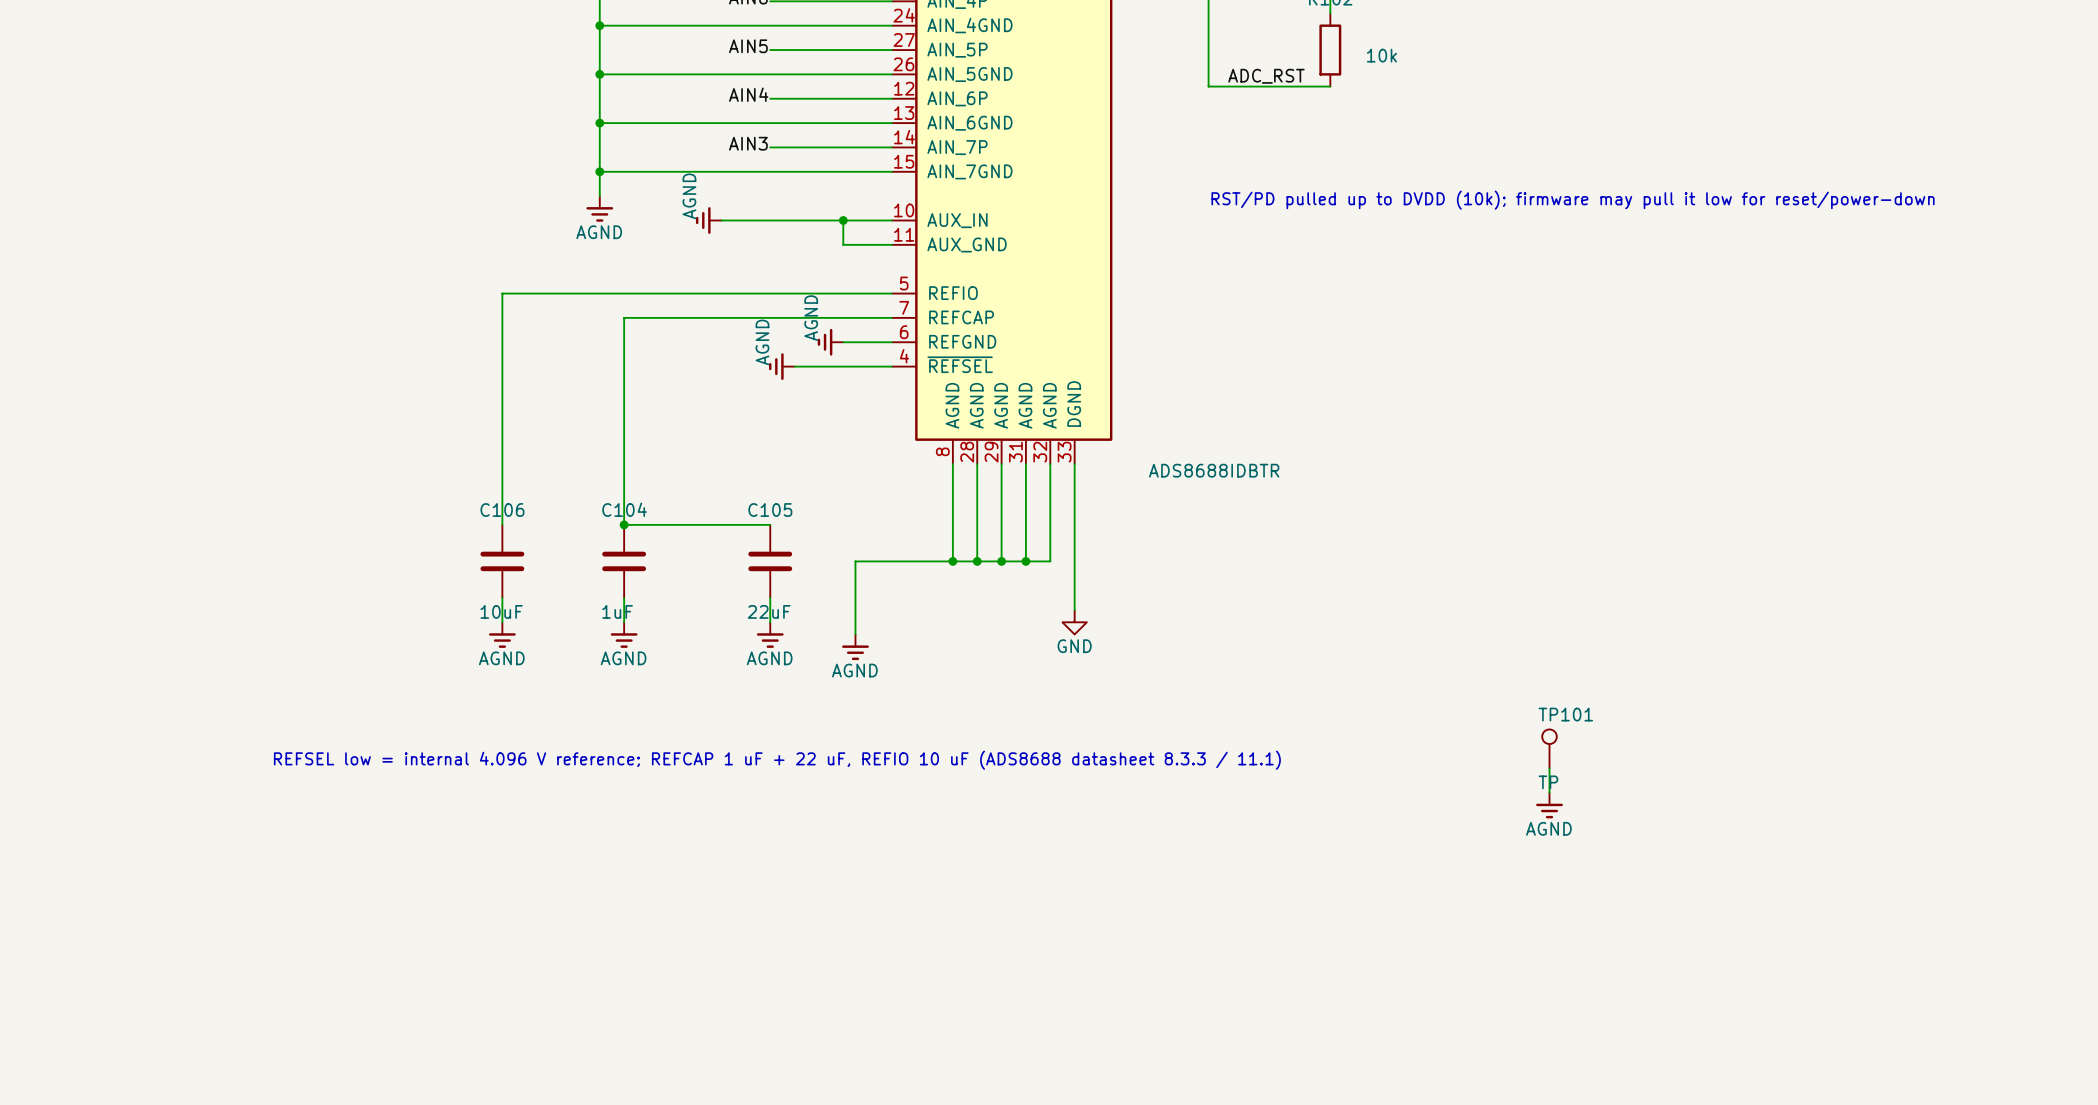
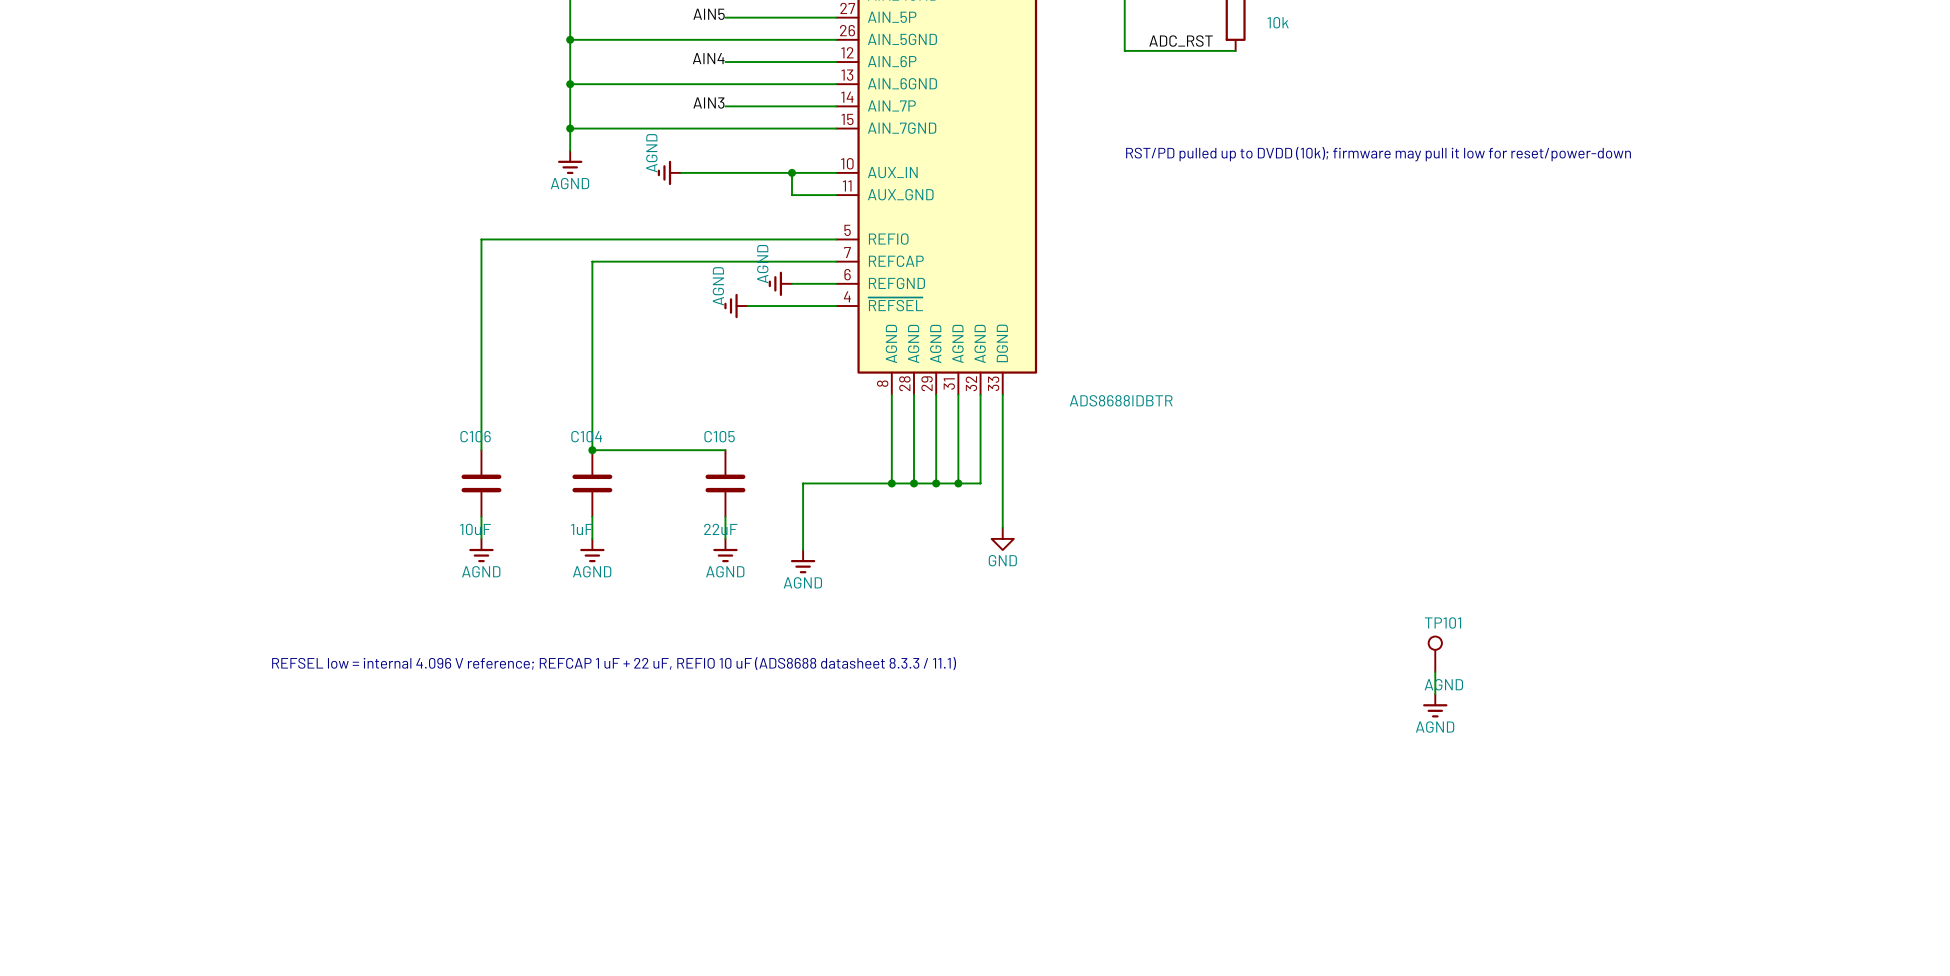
TP101 value: TP (1548, 782) -> AGND (1443, 684)

